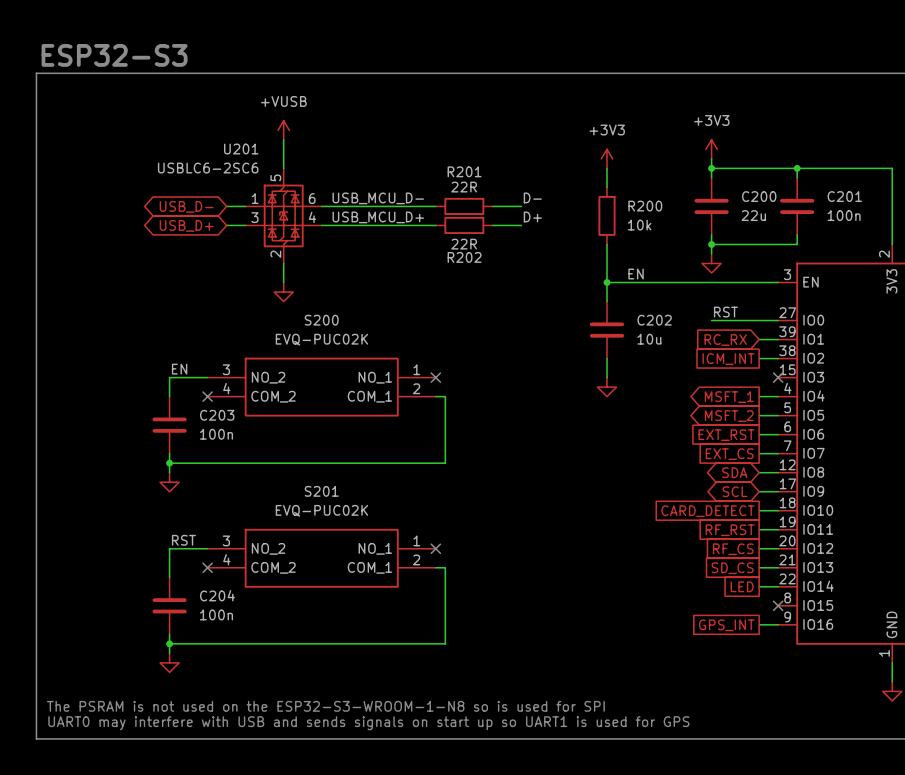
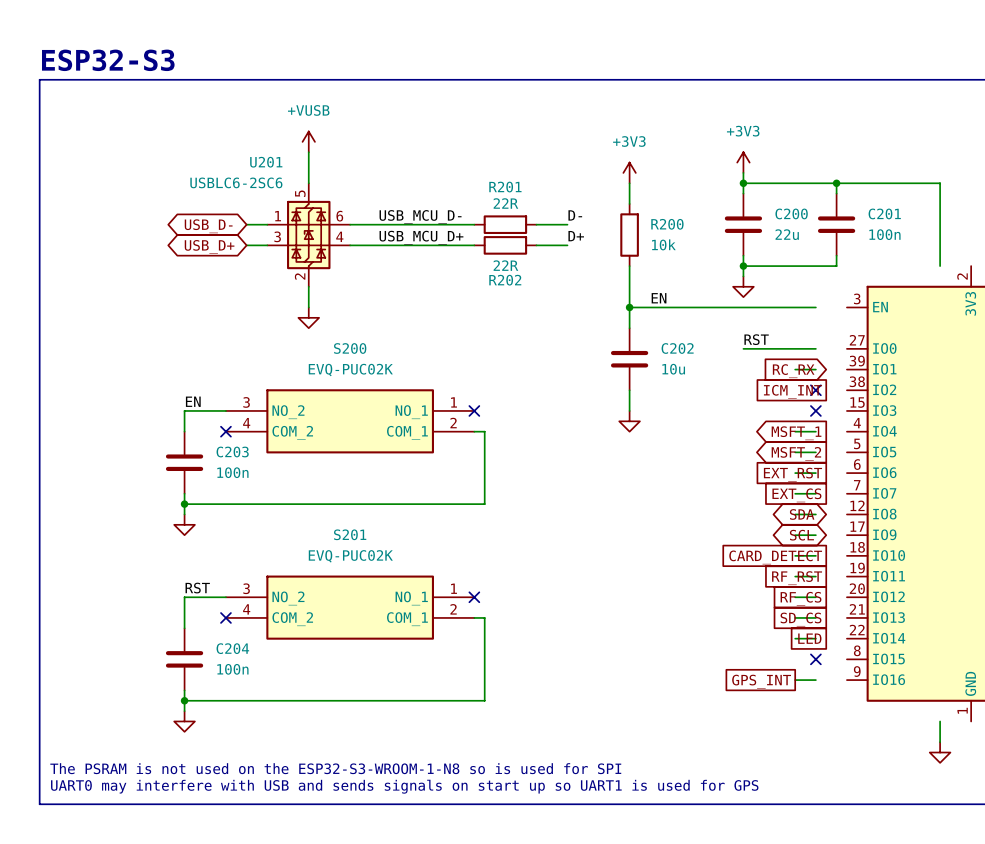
power symbol position: +3V3 (711, 149) -> +3V3 (743, 162)
power symbol position: +3V3 (606, 158) -> +3V3 (629, 172)
wire: (711, 158) (711, 177) -> (743, 172) (743, 193)
wire: (606, 168) (606, 187) -> (629, 183) (629, 203)
wire: none -> (743, 183) (774, 183)
junction: none -> (743, 183)
junction: (711, 168) -> none
junction: none -> (836, 183)
wire: (797, 168) (797, 177) -> (836, 183) (836, 193)
junction: (797, 168) -> none
wire: (863, 168) (892, 168) (892, 244) -> (940, 183) (940, 266)
C200 position: (711, 206) -> (743, 224)
C201 position: (797, 206) -> (836, 224)
R200 position: (606, 215) -> (629, 235)
wire: (711, 234) (711, 253) -> (743, 255) (743, 276)
wire: (797, 234) (797, 244) (768, 244) -> (836, 255) (836, 266)
wire: (606, 244) (606, 301) -> (629, 266) (629, 328)
junction position: (711, 244) -> (743, 266)
power symbol position: (711, 263) -> (743, 286)
label position: EN (636, 274) -> EN (659, 298)
wire: none -> (629, 307) (660, 307)
junction position: (606, 282) -> (629, 307)
wire: (749, 282) (778, 282) -> (743, 266) (774, 266)
label position: RST (725, 312) -> RST (756, 339)
wire: (749, 320) (778, 320) -> (743, 348) (774, 348)
C202 position: (606, 330) -> (629, 359)
wire: (759, 339) (778, 339) -> (795, 369) (815, 369)
wire: (606, 358) (606, 377) -> (629, 390) (629, 410)
no-connect mark: none -> (815, 390)
wire: (759, 358) (778, 358) -> none
no-connect mark: none -> (815, 410)
no-connect mark: (778, 377) -> none
power symbol position: (606, 387) -> (629, 421)
wire: (759, 396) (778, 396) -> (795, 431) (815, 431)
wire: (759, 415) (778, 415) -> (795, 452) (815, 452)
wire: (759, 434) (778, 434) -> (795, 473) (815, 473)
wire: (759, 453) (778, 453) -> (795, 493) (815, 493)
wire: (759, 472) (778, 472) -> (795, 514) (815, 514)
wire: (759, 491) (778, 491) -> (795, 535) (815, 535)
wire: (759, 510) (778, 510) -> (795, 555) (815, 555)
wire: (759, 529) (778, 529) -> (795, 576) (815, 576)
wire: (759, 548) (778, 548) -> (795, 597) (815, 597)
wire: (759, 567) (778, 567) -> (795, 617) (815, 617)
wire: (759, 586) (778, 586) -> (795, 638) (815, 638)
no-connect mark position: (778, 605) -> (815, 659)
wire: (759, 624) (778, 624) -> (795, 680) (815, 680)
global label position: GPS_INT (726, 625) -> GPS_INT (761, 681)
wire: (892, 662) (892, 681) -> (940, 721) (940, 742)
power symbol position: (892, 691) -> (940, 752)

